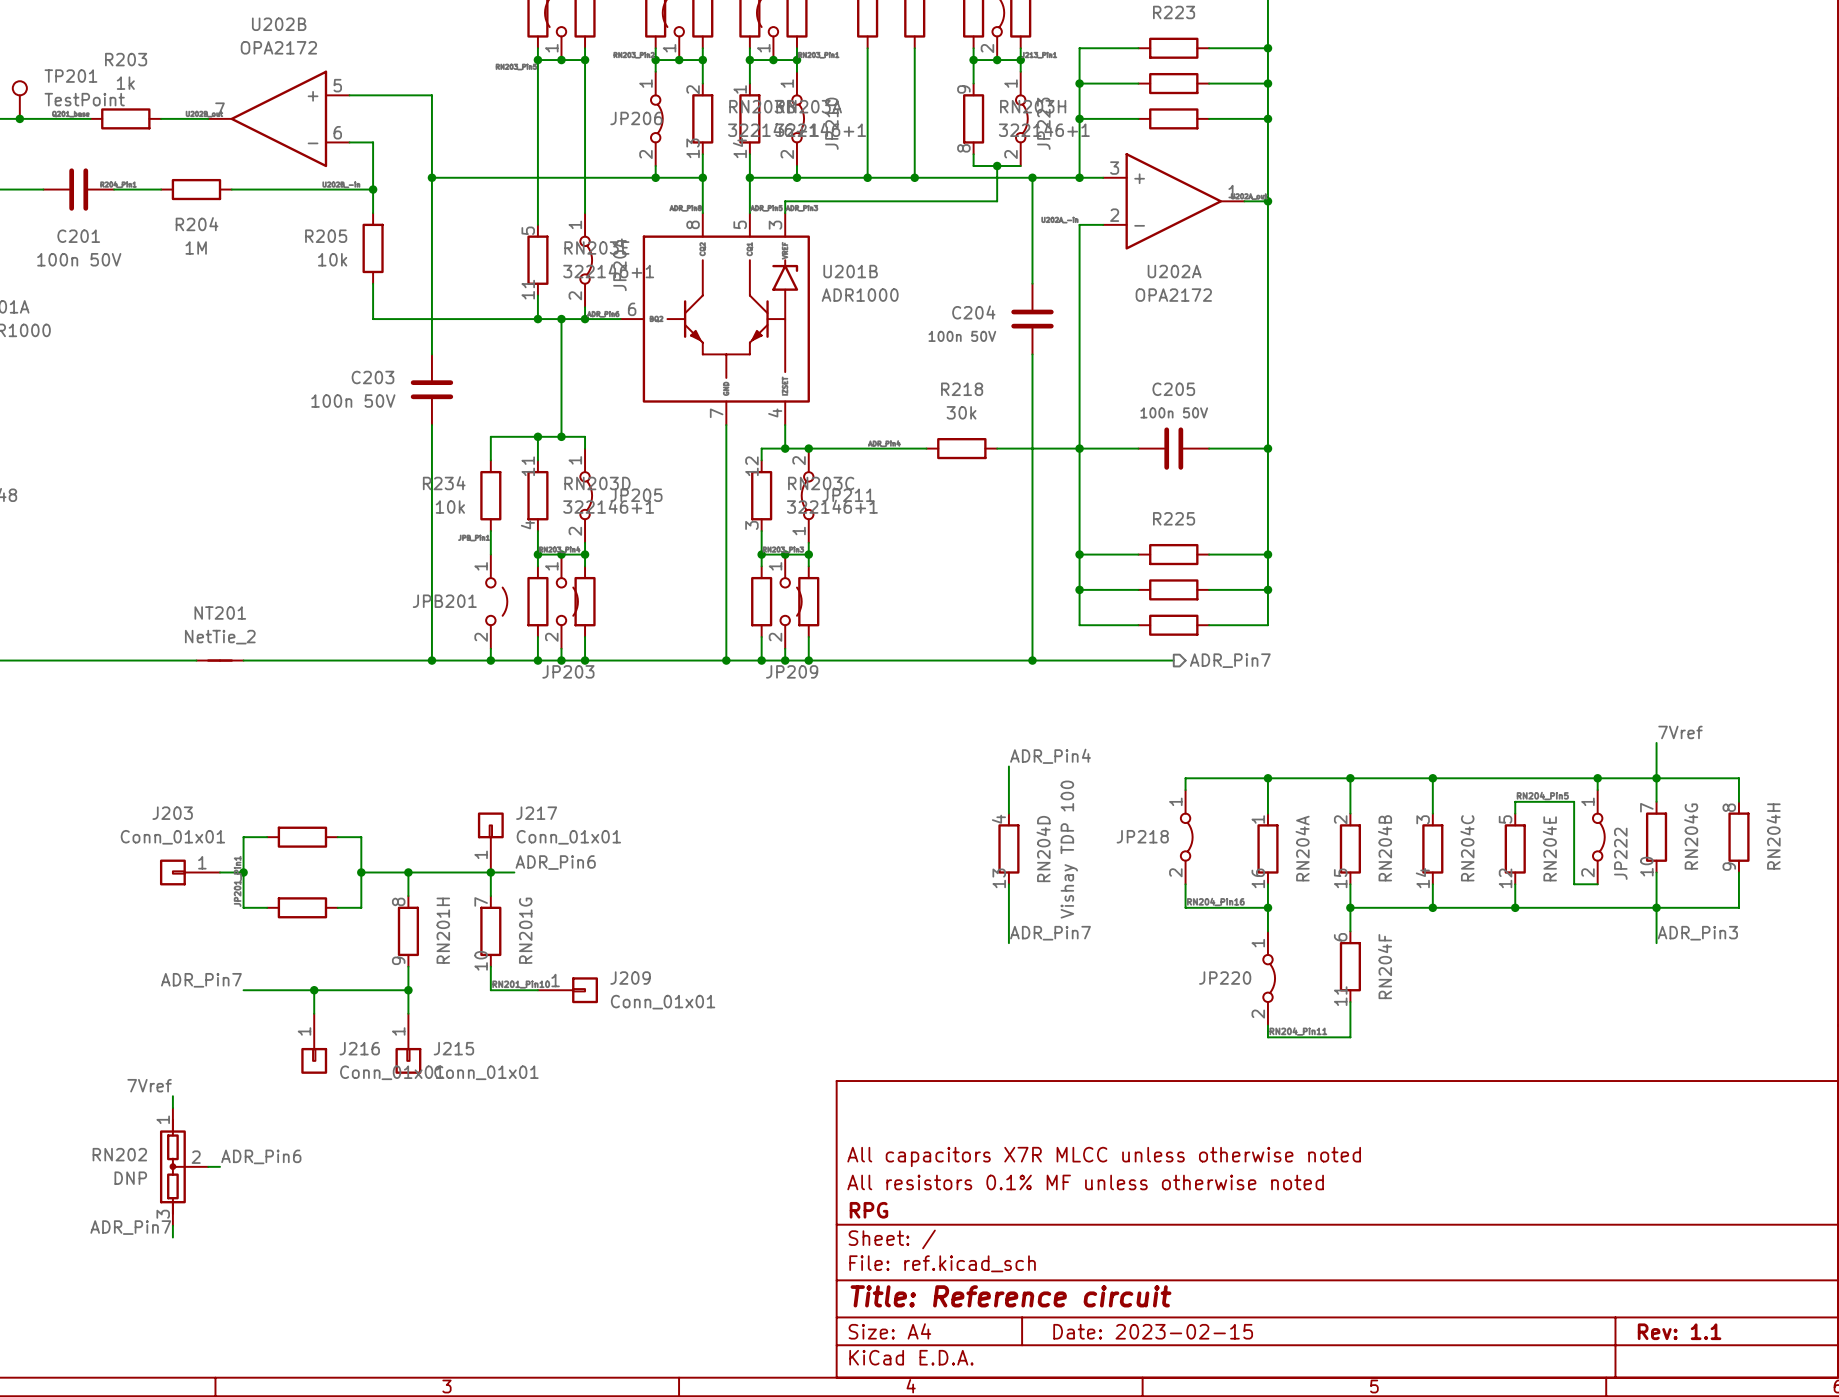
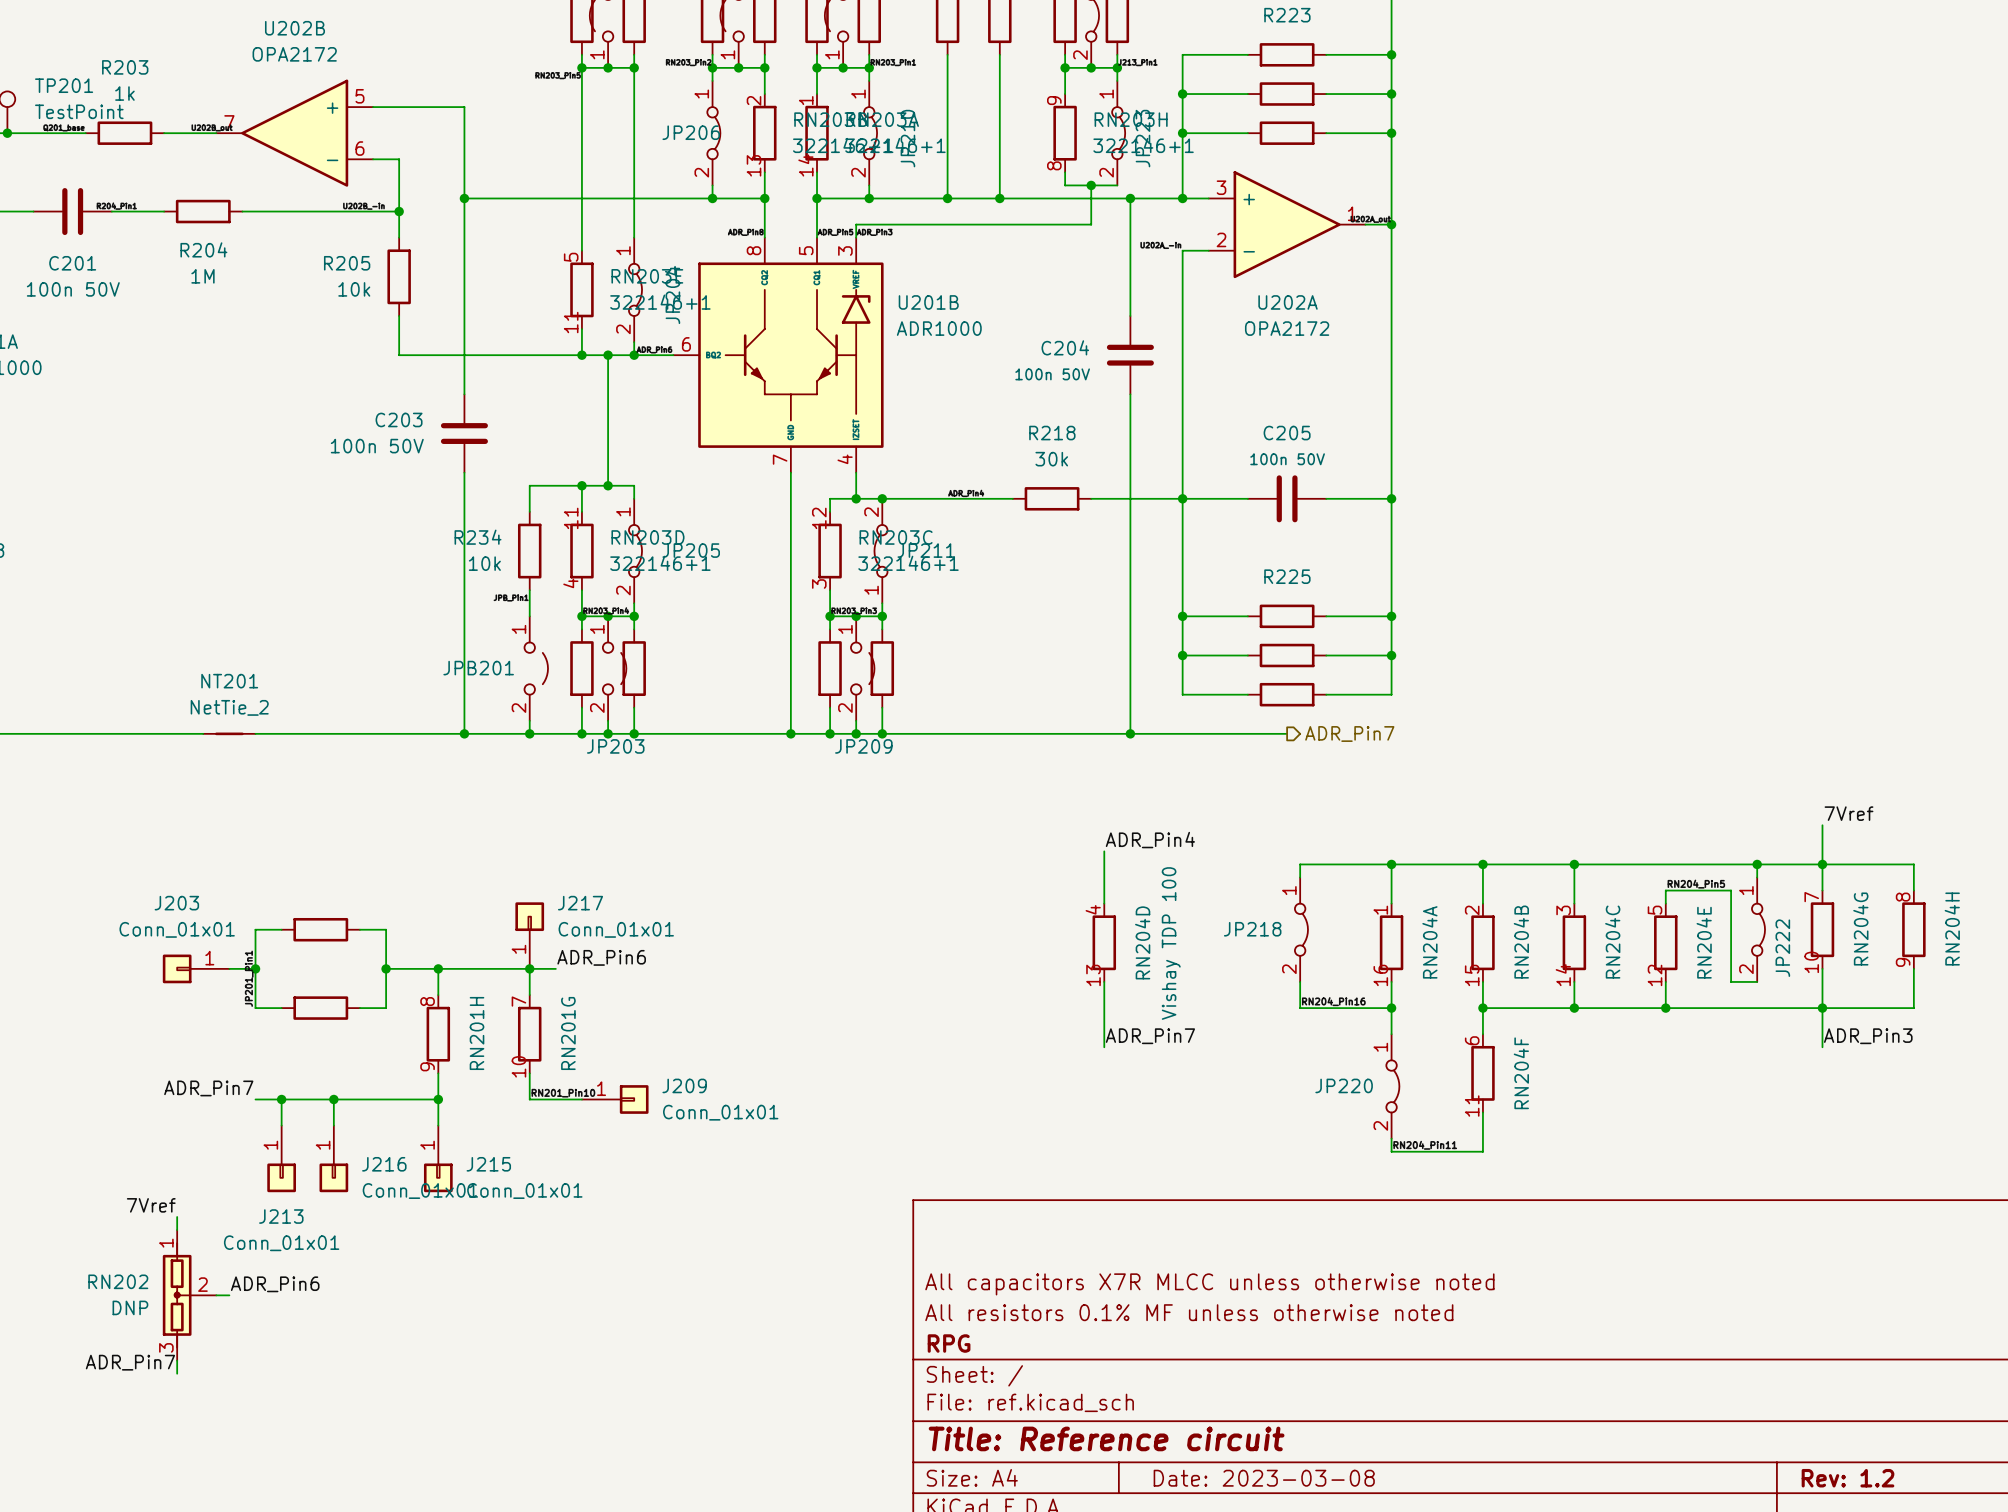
wire: none -> (281, 1099) (281, 1125)
junction: none -> (281, 1099)
J213: none -> Conn_01x01 (281, 1158)
title block: Date: 2023-02-15 (1153, 1331) -> Date: 2023-03-08 (1264, 1478)
title block: Rev: 1.1 (1679, 1331) -> Rev: 1.2 (1847, 1478)

